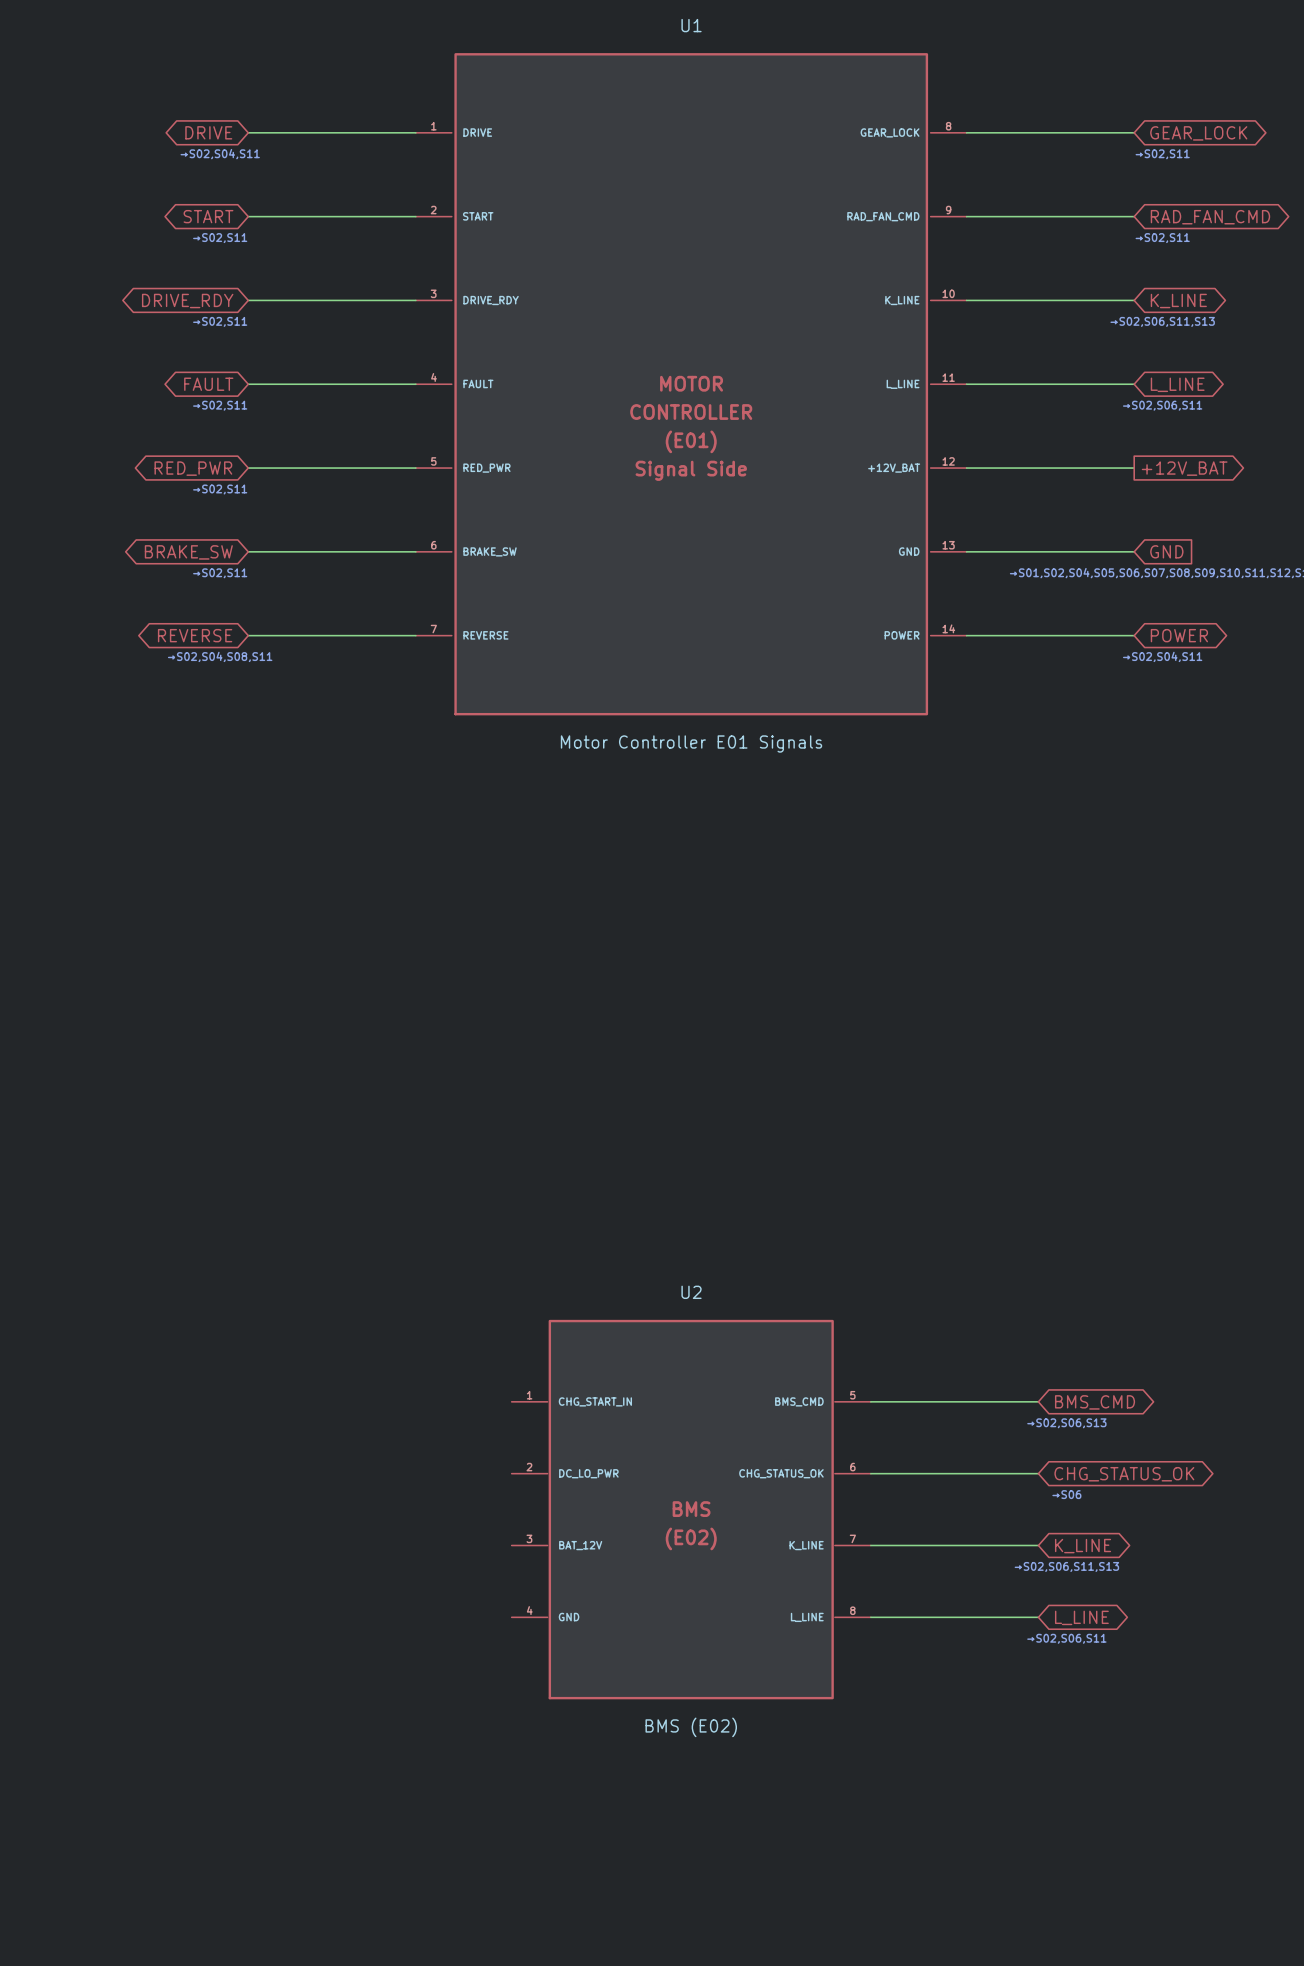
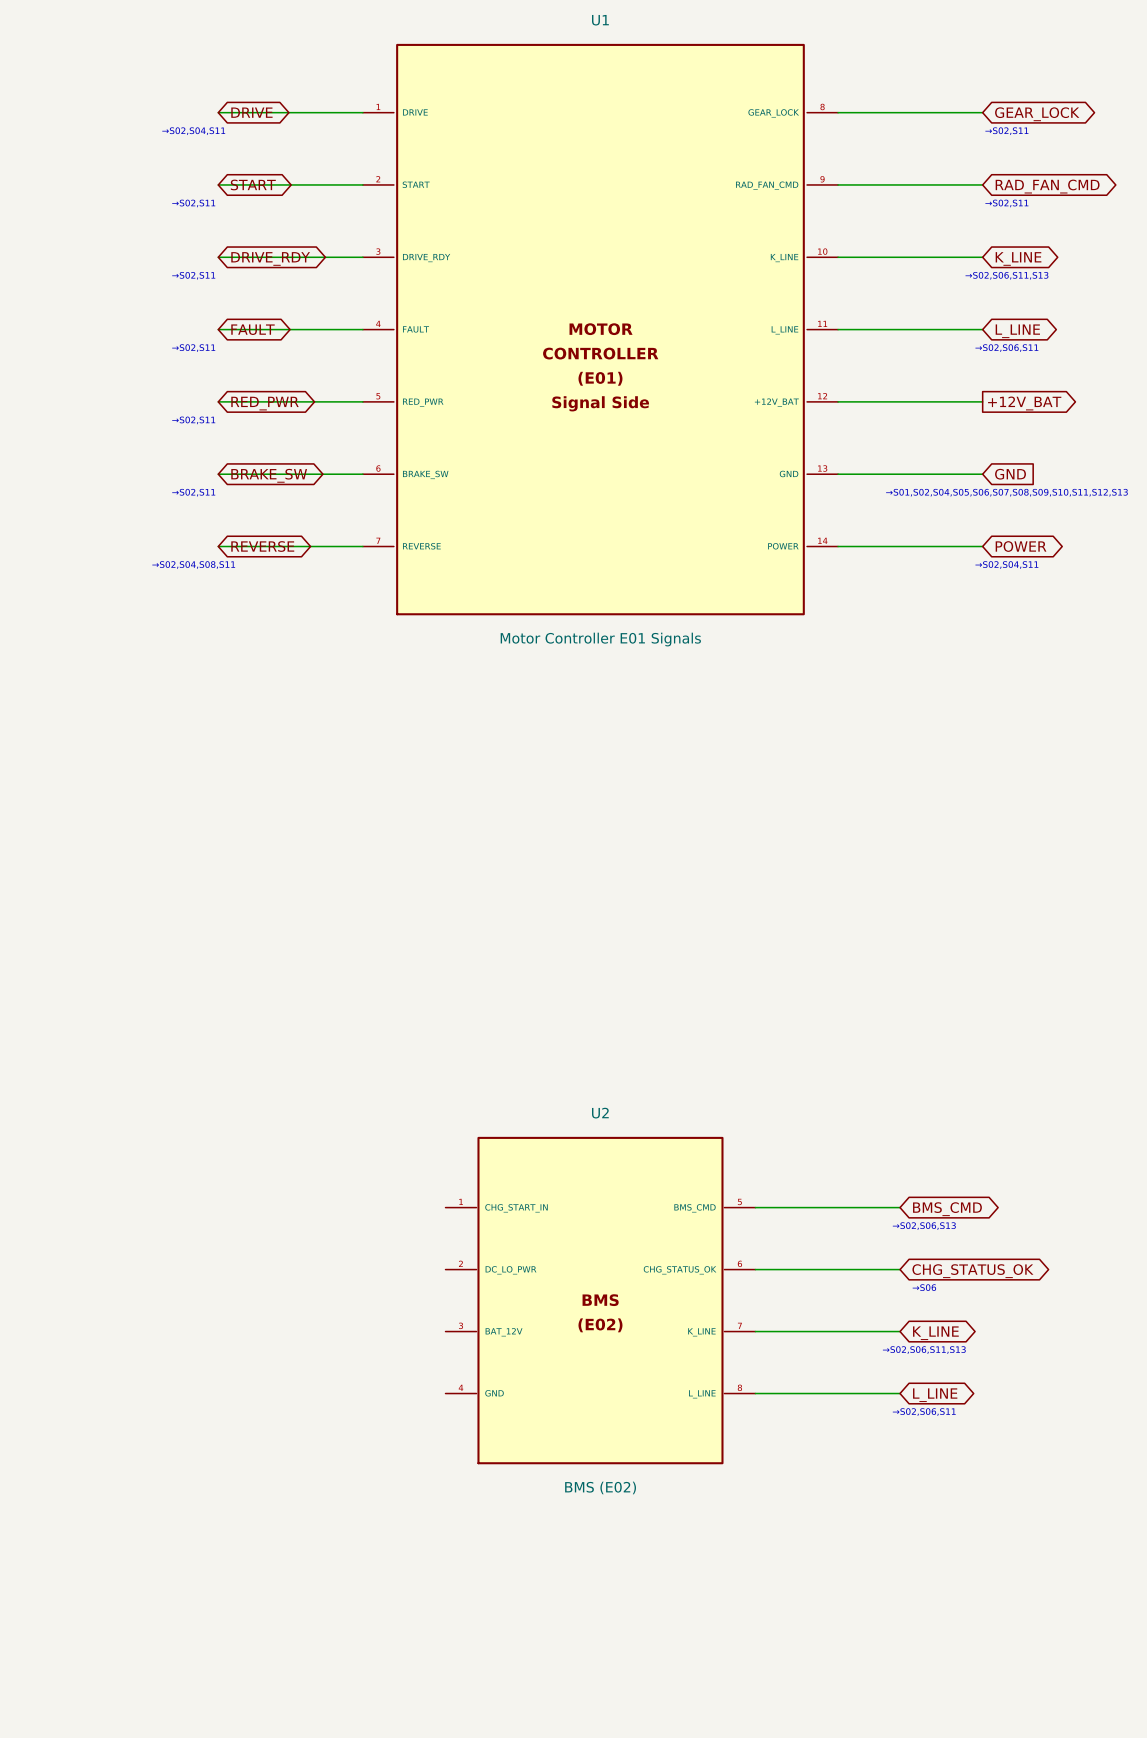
global label rotation: 0° (208, 132) -> 180° (251, 112)
global label rotation: 0° (208, 216) -> 180° (253, 184)
global label rotation: 0° (187, 301) -> 180° (270, 258)
global label position: DRIVE_RDY (187, 301) -> DRIVE_RDY (270, 258)
global label rotation: 0° (208, 384) -> 180° (253, 329)
global label rotation: 0° (193, 468) -> 180° (264, 403)
global label rotation: 0° (188, 552) -> 180° (269, 475)
global label rotation: 0° (195, 635) -> 180° (262, 546)

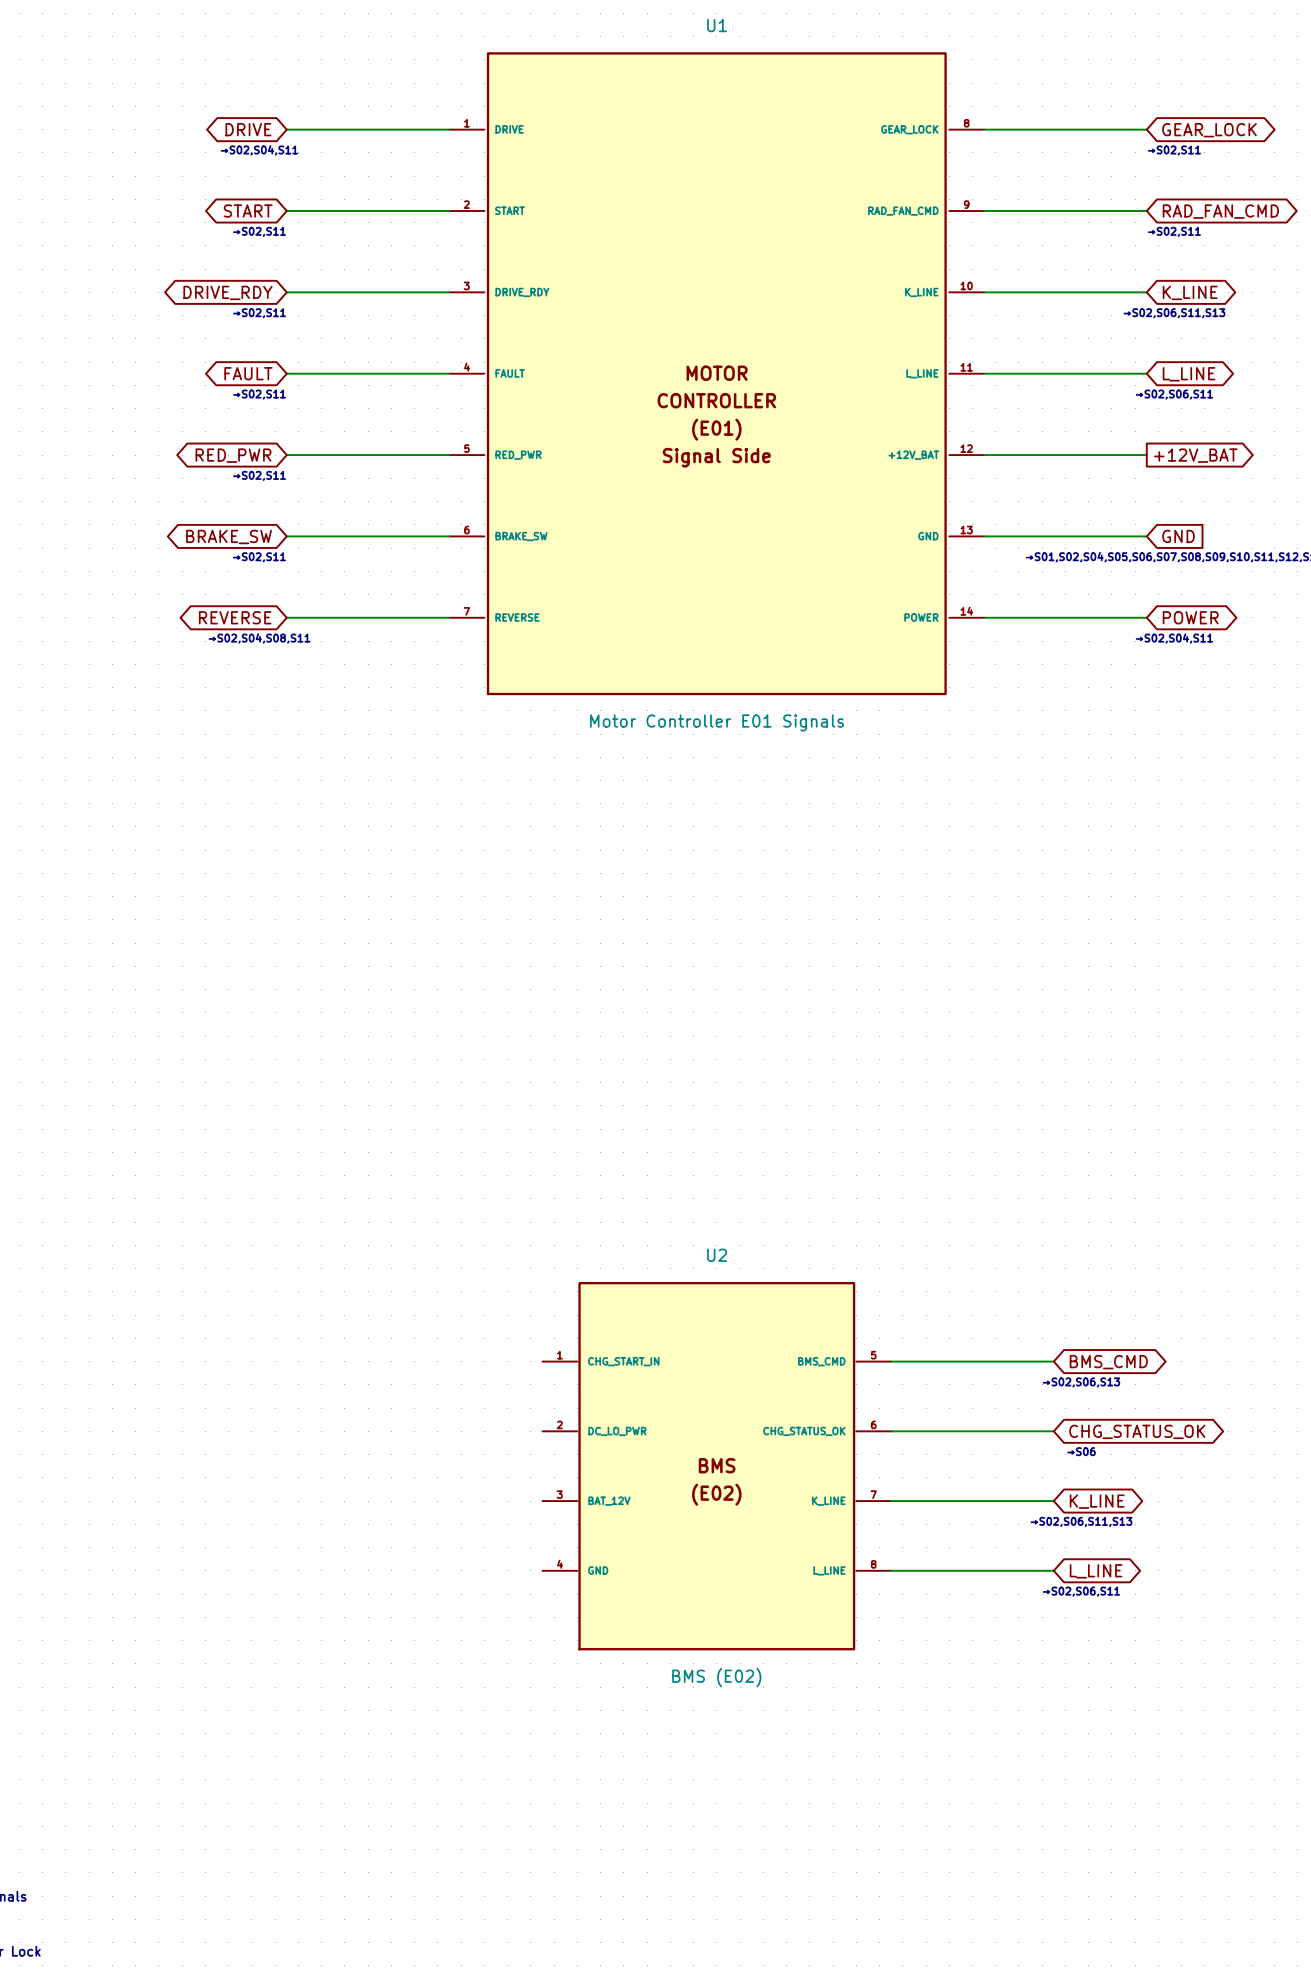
global label rotation: 0° (251, 112) -> 180° (248, 129)
global label rotation: 0° (253, 184) -> 180° (248, 211)
global label rotation: 0° (270, 258) -> 180° (227, 292)
global label position: DRIVE_RDY (270, 258) -> DRIVE_RDY (227, 292)
global label rotation: 0° (253, 329) -> 180° (248, 373)
global label rotation: 0° (264, 403) -> 180° (233, 455)
global label rotation: 0° (269, 475) -> 180° (229, 536)
global label rotation: 0° (262, 546) -> 180° (235, 617)

